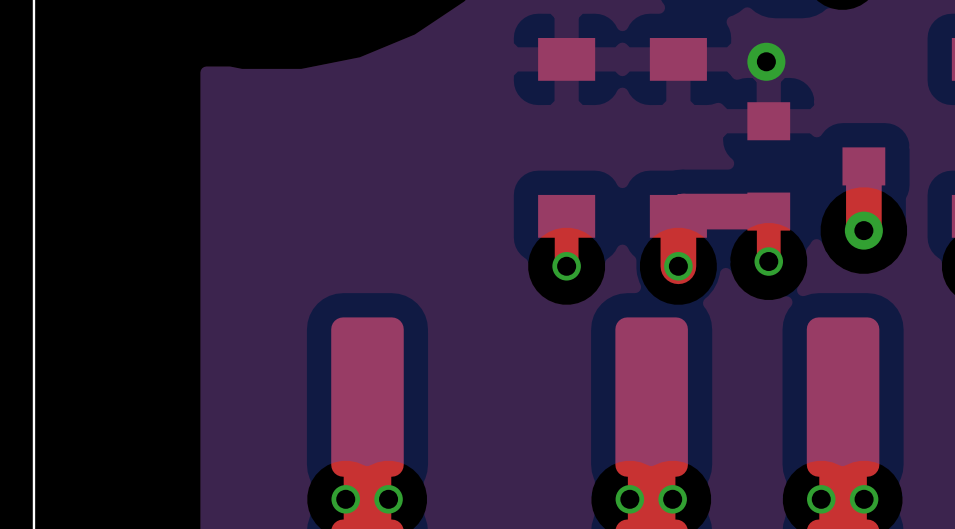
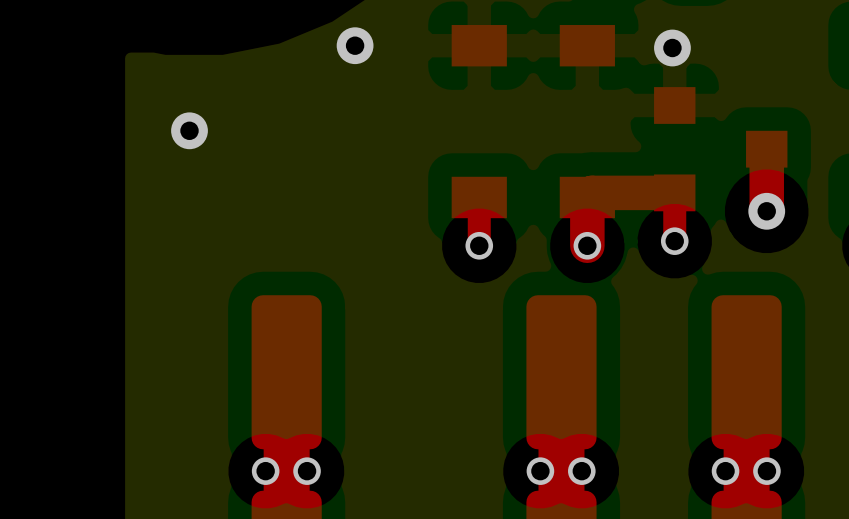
via: none -> (355, 45)
via: none -> (189, 130)

